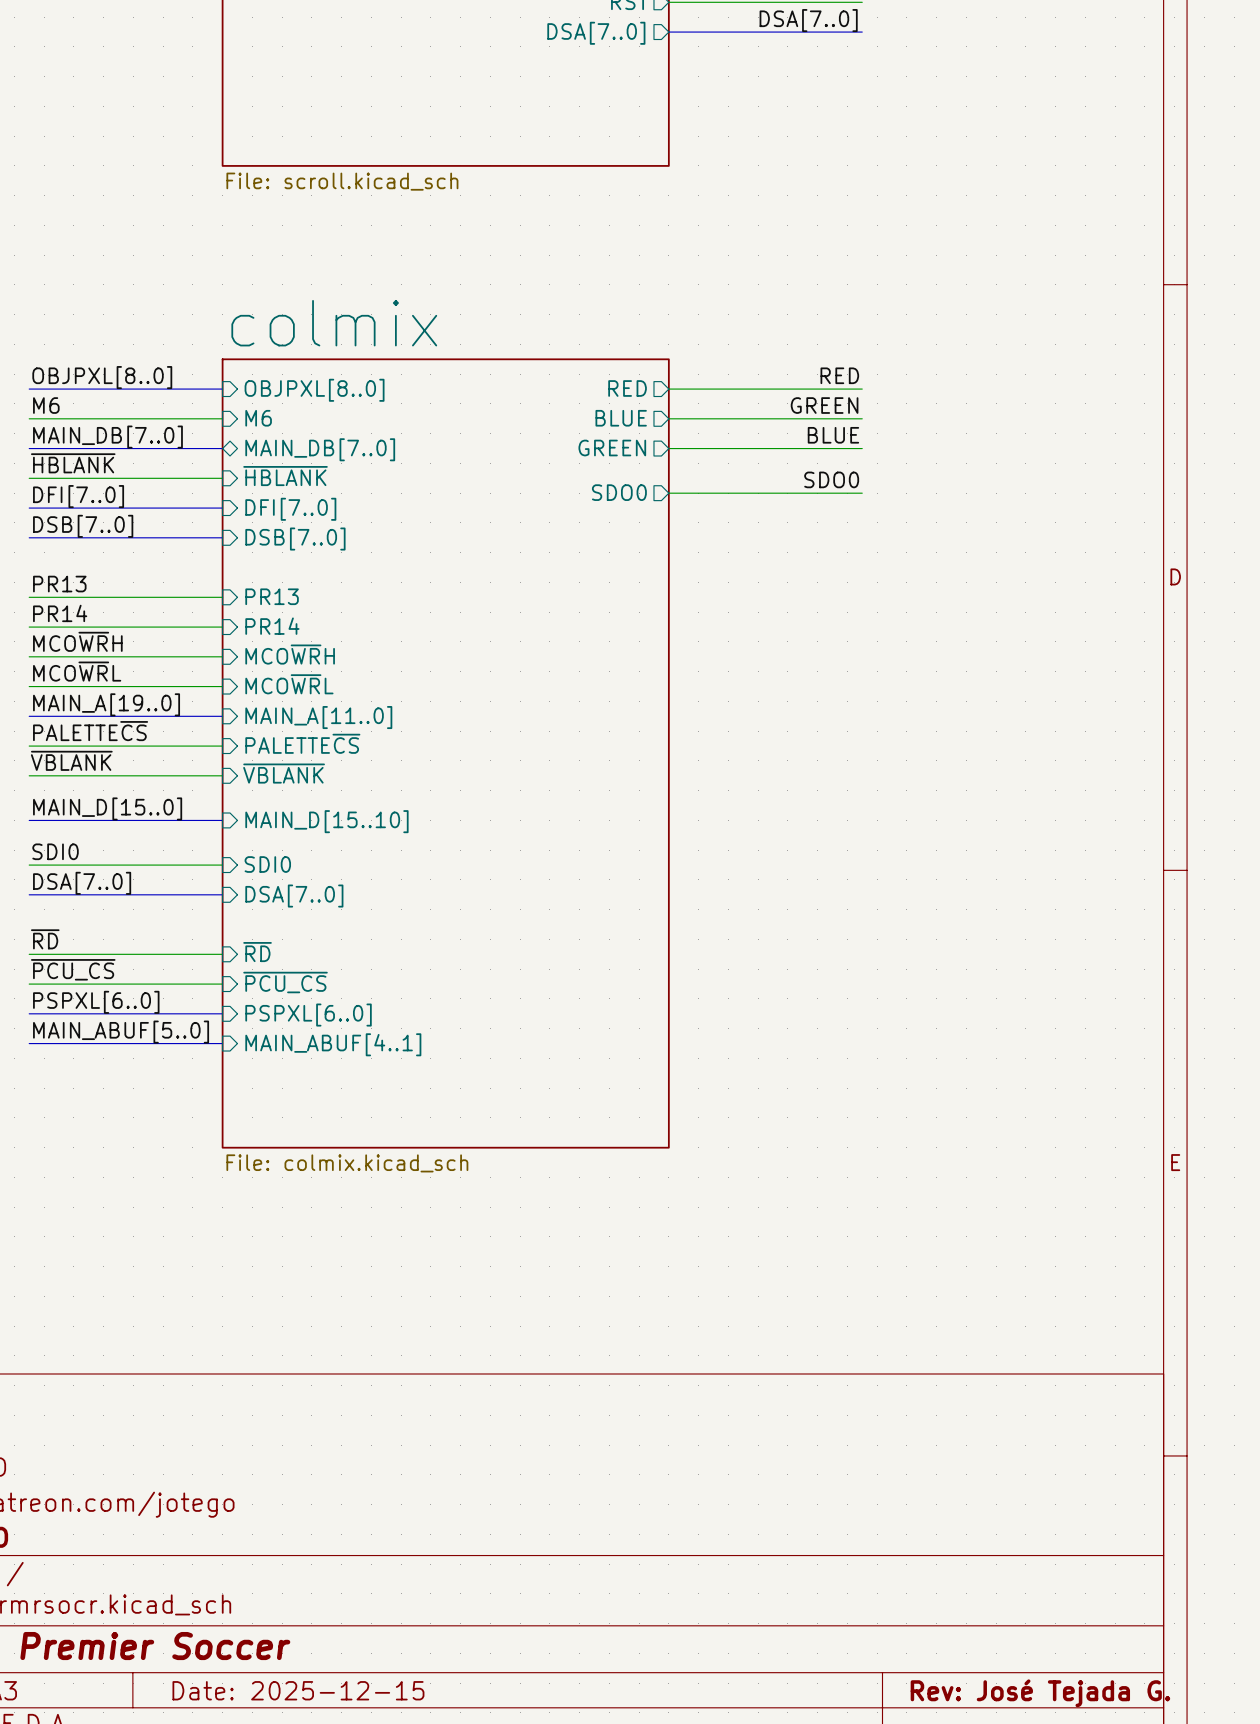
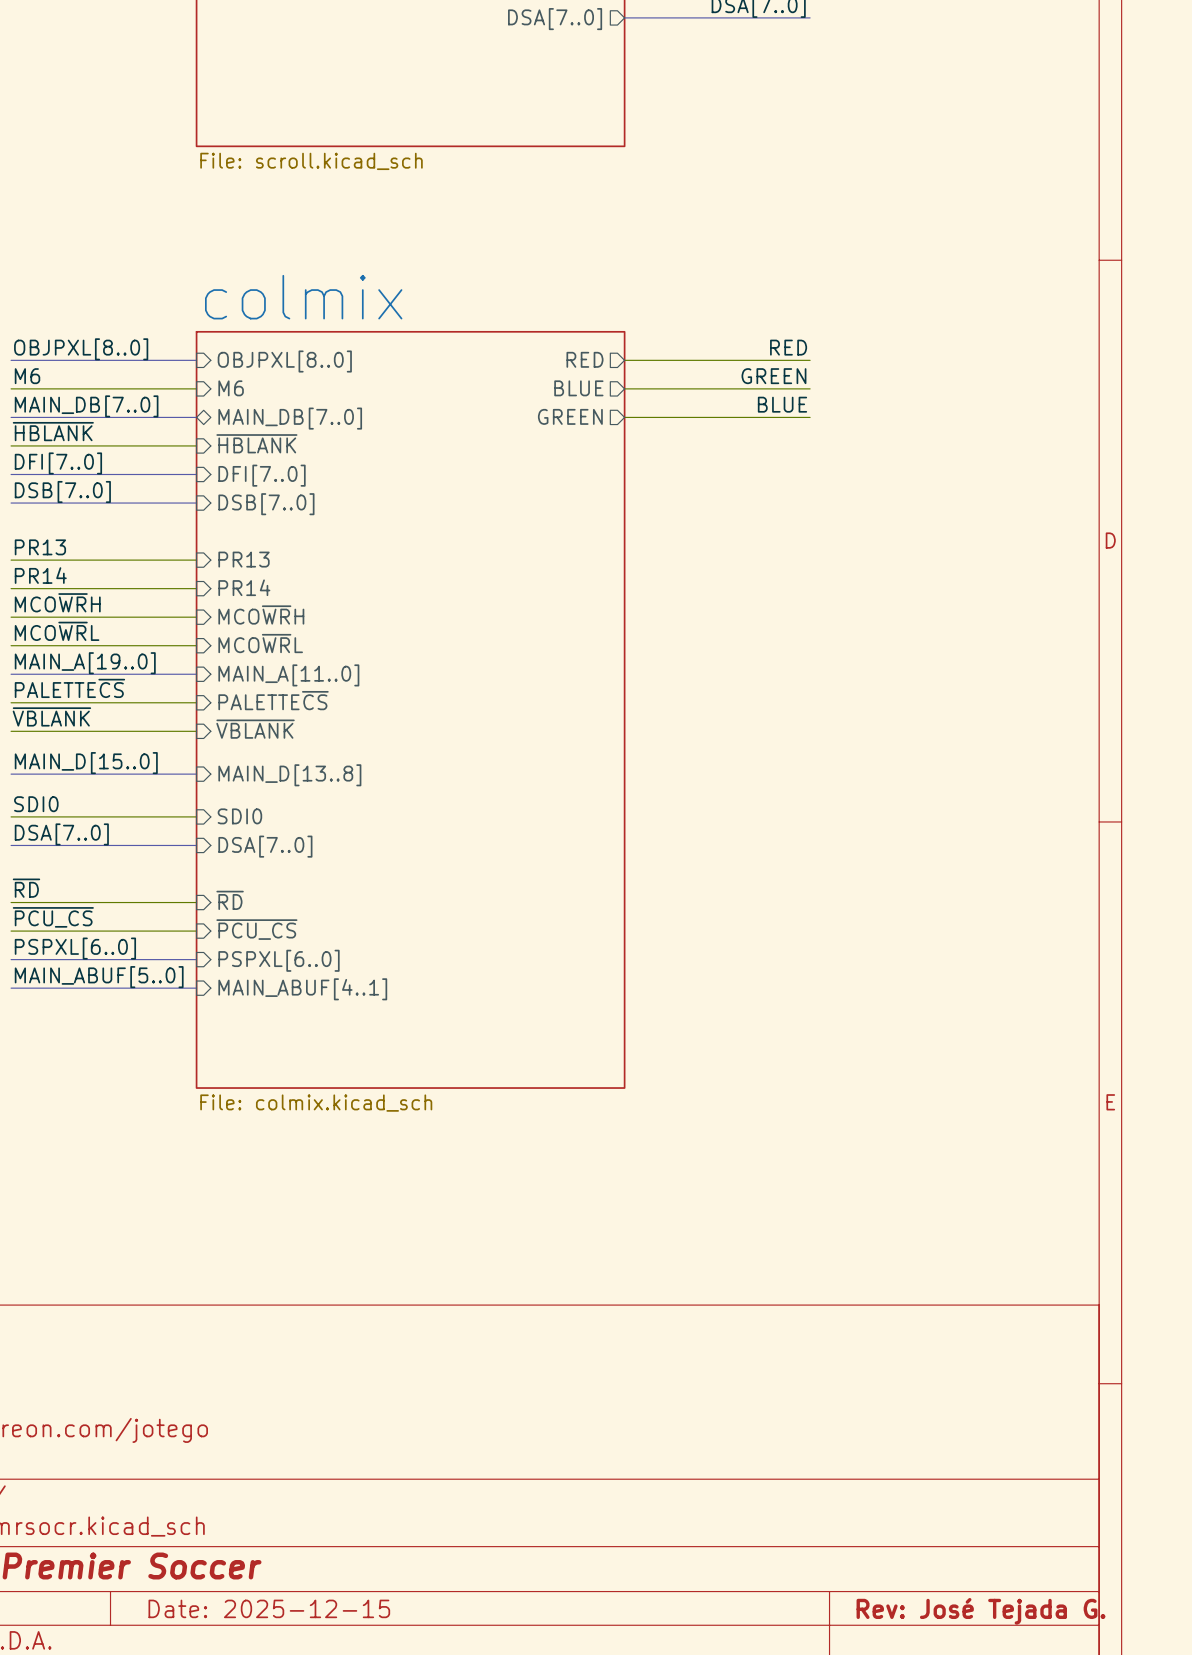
label: SDO0 (831, 479) -> none
sheet pin: SDO0 (619, 492) -> none
wire: (668, 493) (862, 493) -> none
sheet pin: MAIN_D[15..10] (326, 821) -> MAIN_D[13..8] (289, 775)

